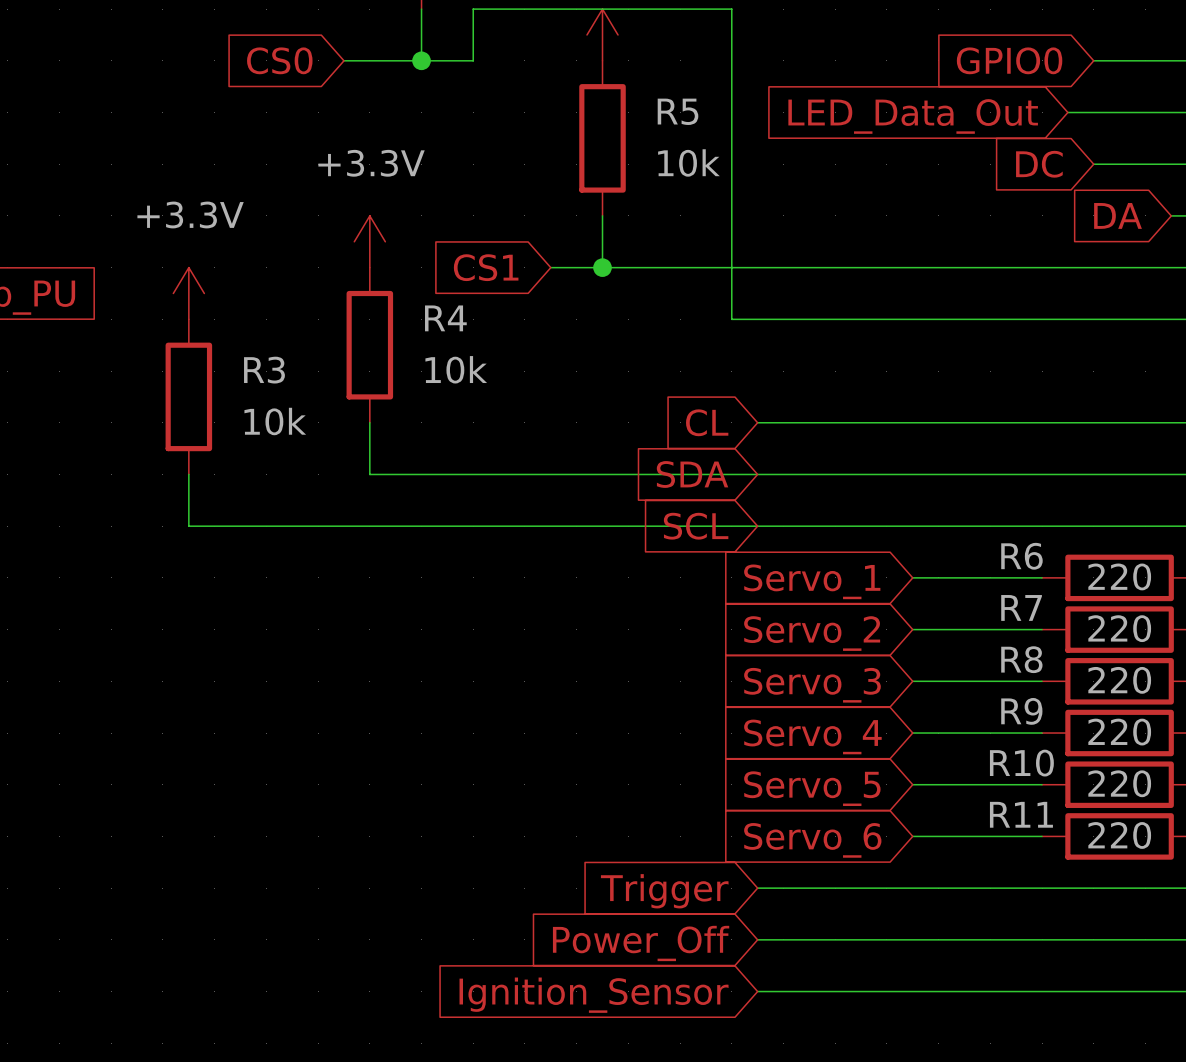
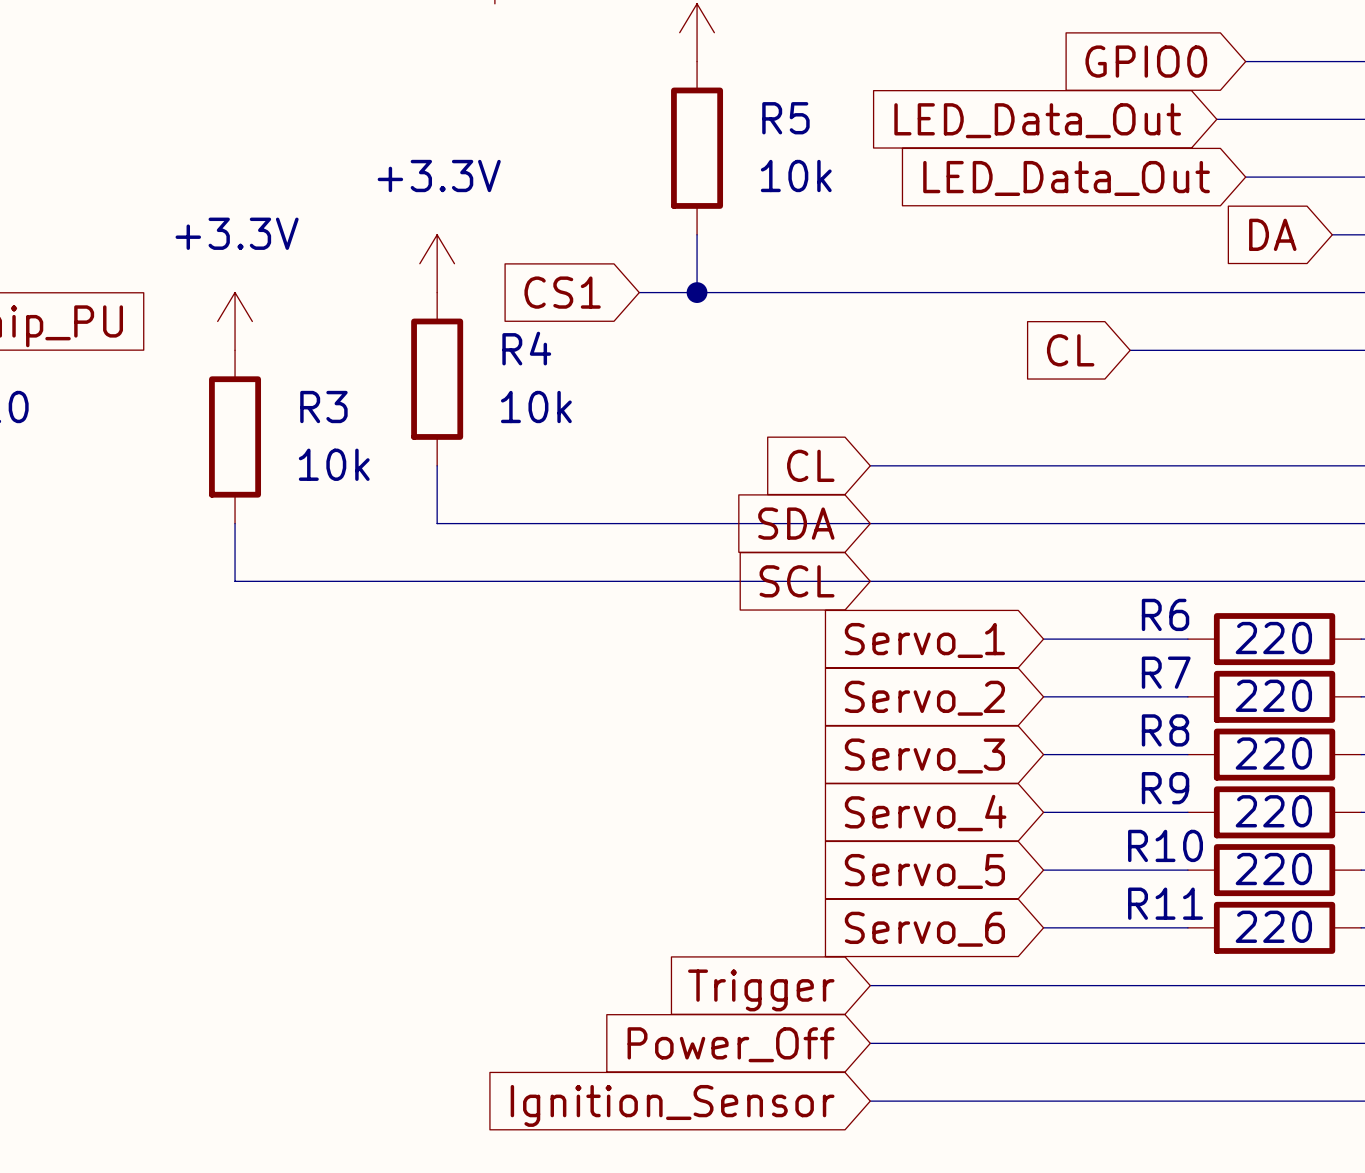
wire: (421, 9) (421, 60) -> none
global label: CS0 (279, 60) -> none
wire: (343, 60) (473, 60) (473, 9) (731, 9) (731, 319) (990, 319) -> none
junction: (421, 60) -> none
global label: DC (1039, 164) -> LED_Data_Out (1066, 178)
global label: none -> CL (1070, 350)

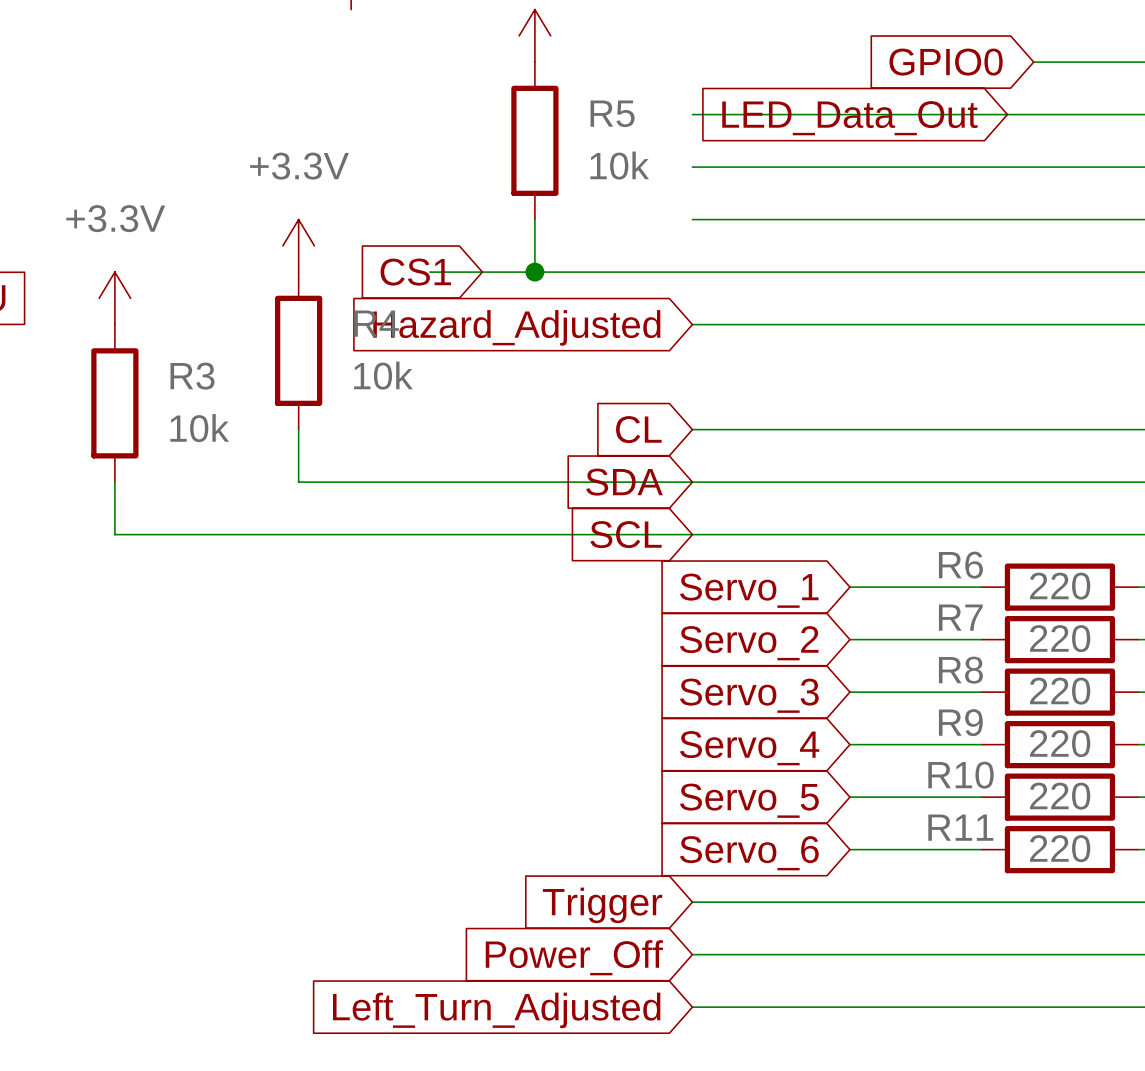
wire: none -> (692, 114) (1007, 114)
wire: none -> (692, 167) (1033, 167)
global label: LED_Data_Out (1066, 178) -> none
wire: none -> (692, 219) (1112, 219)
global label: DA (1272, 234) -> none
wire: none -> (429, 272) (482, 272)
wire: none -> (692, 324) (928, 324)
global label: CL (1070, 350) -> none
global label: none -> Hazard_Adjusted (516, 327)
global label: Ignition_Sensor (672, 1105) -> Left_Turn_Adjusted (496, 1010)

